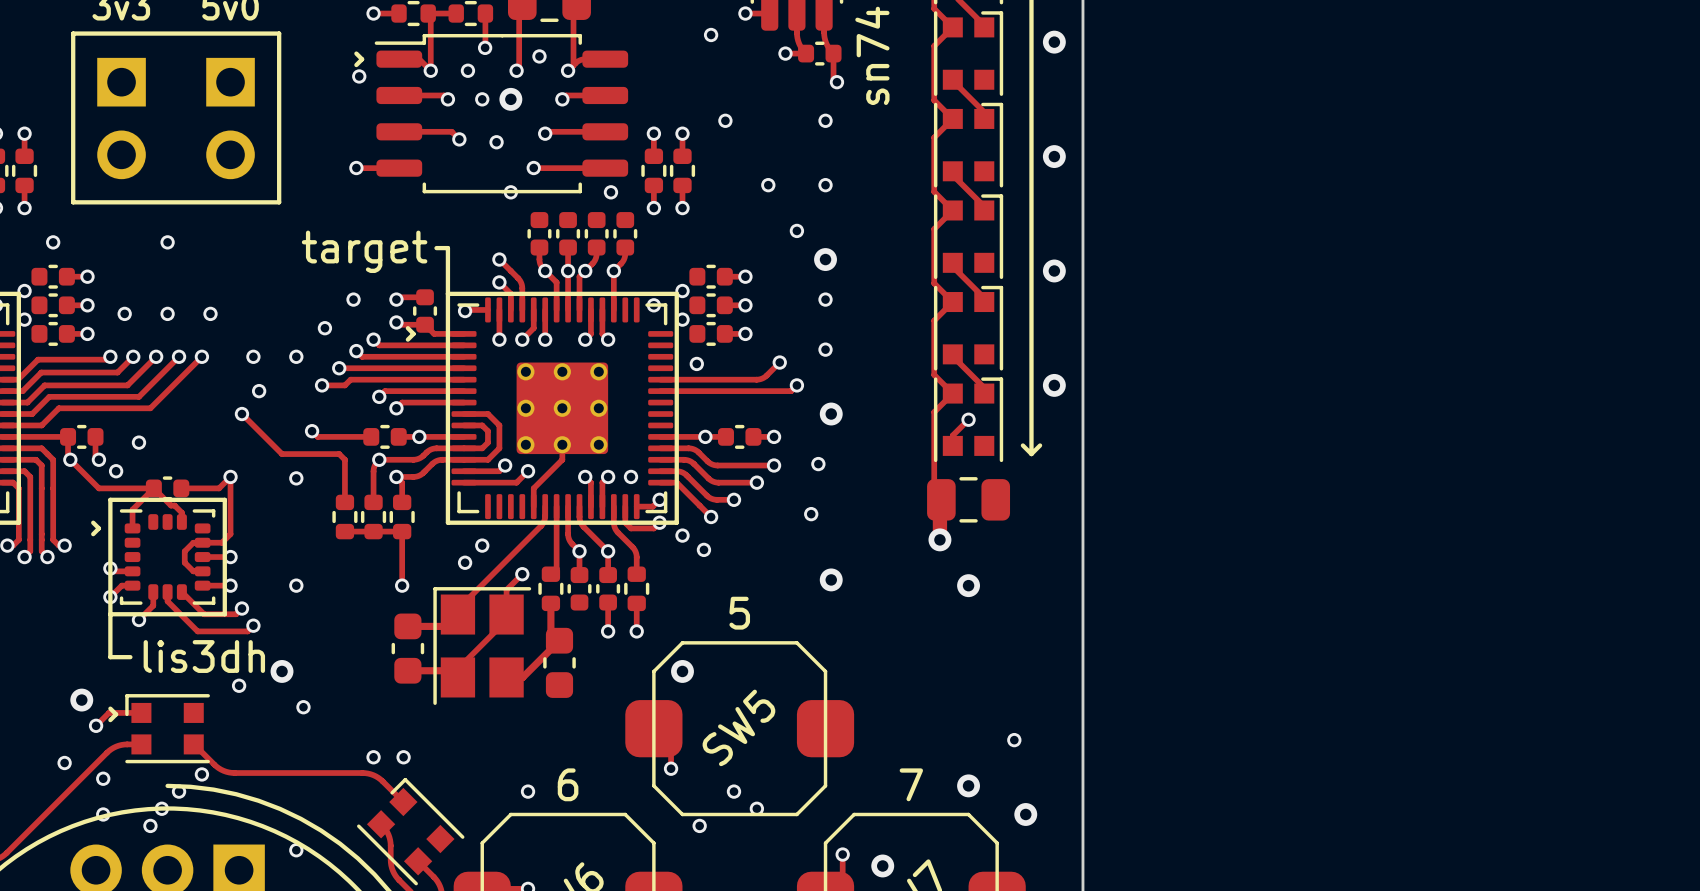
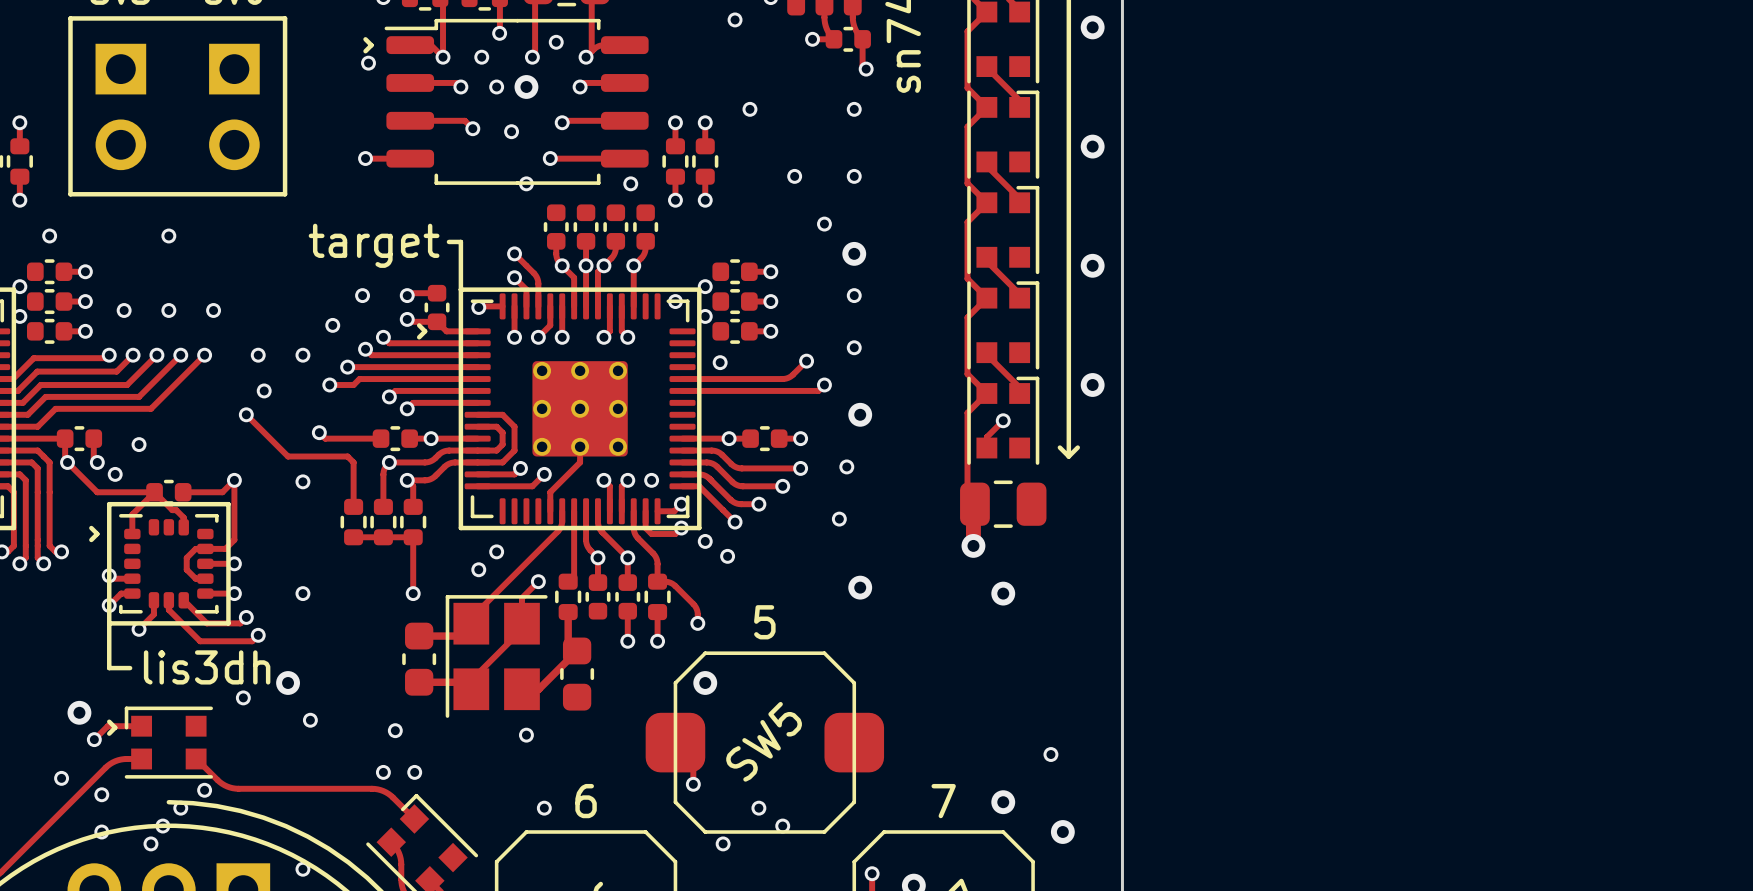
track: none -> (657, 581) (673, 584) (693, 604) (697, 610) (697, 623)
via: none -> (697, 623)
via: none -> (395, 730)
via: none -> (526, 735)

